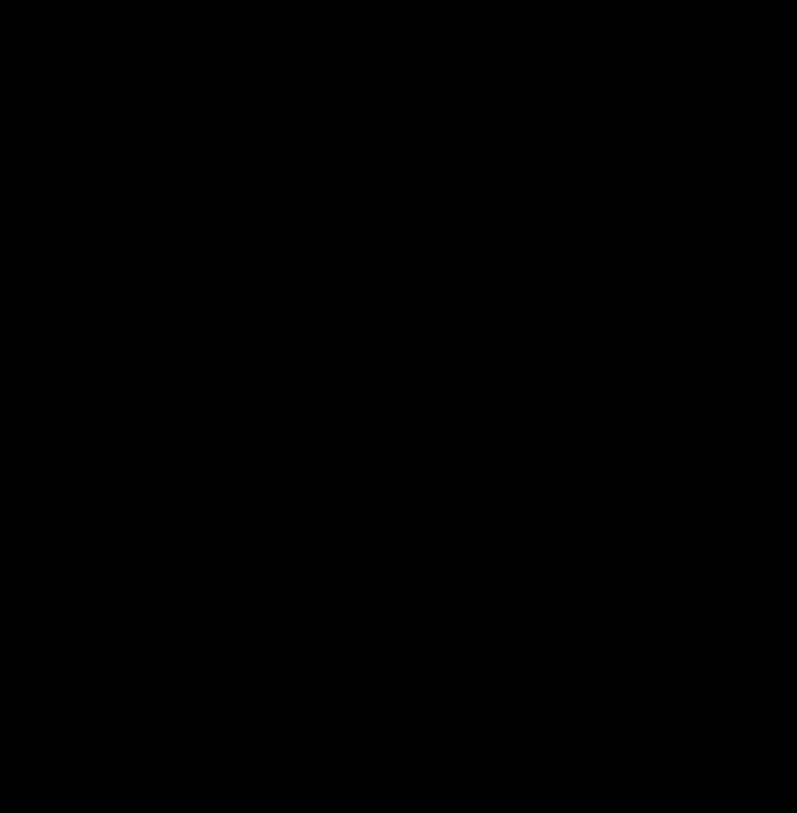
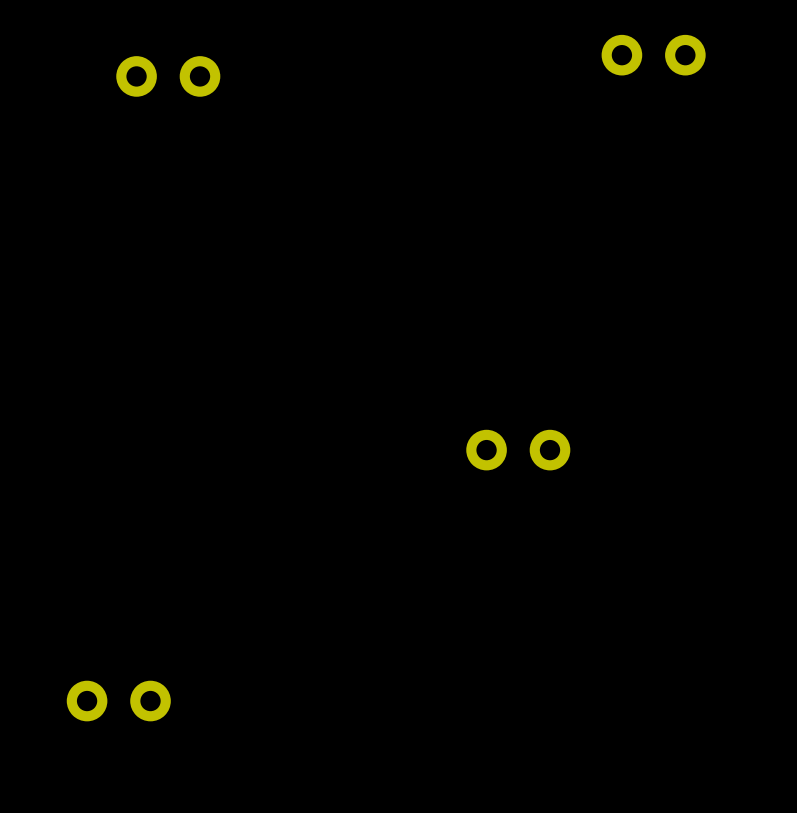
part: none -> (653, 55)
part: none -> (168, 76)
part: none -> (518, 450)
part: none -> (118, 701)

